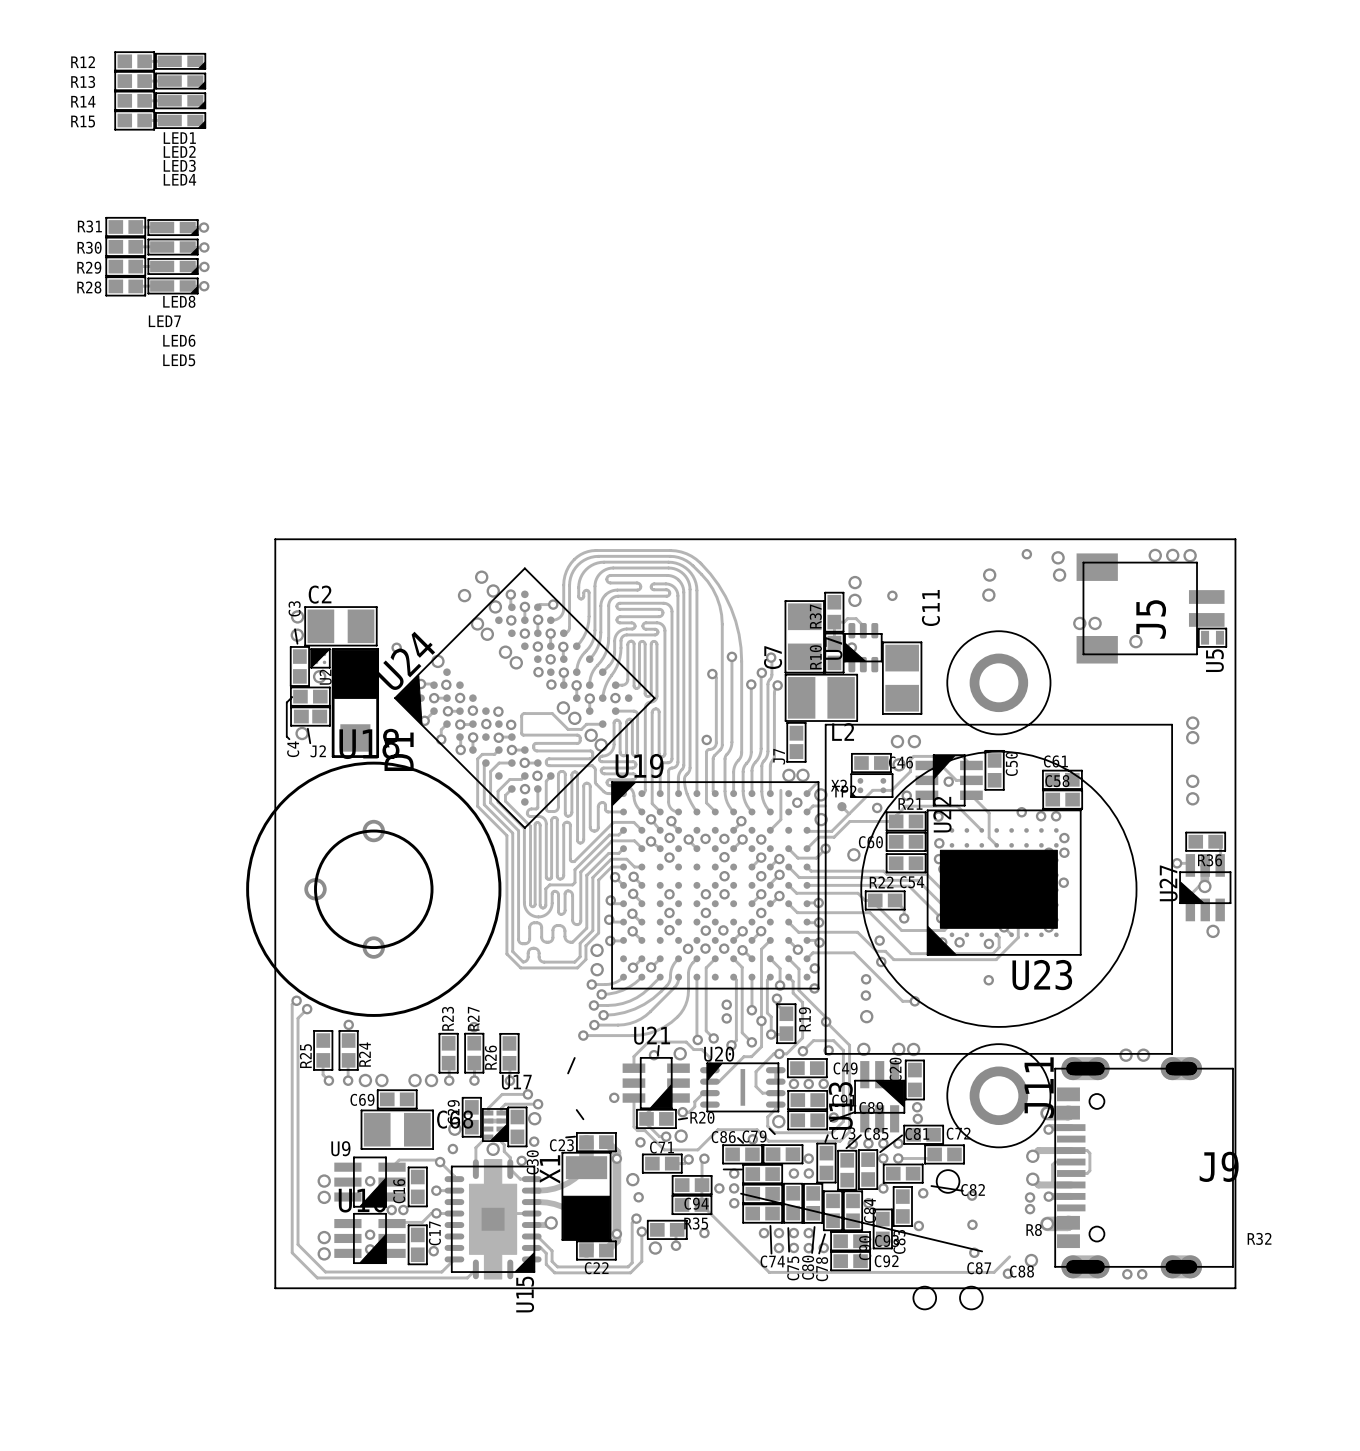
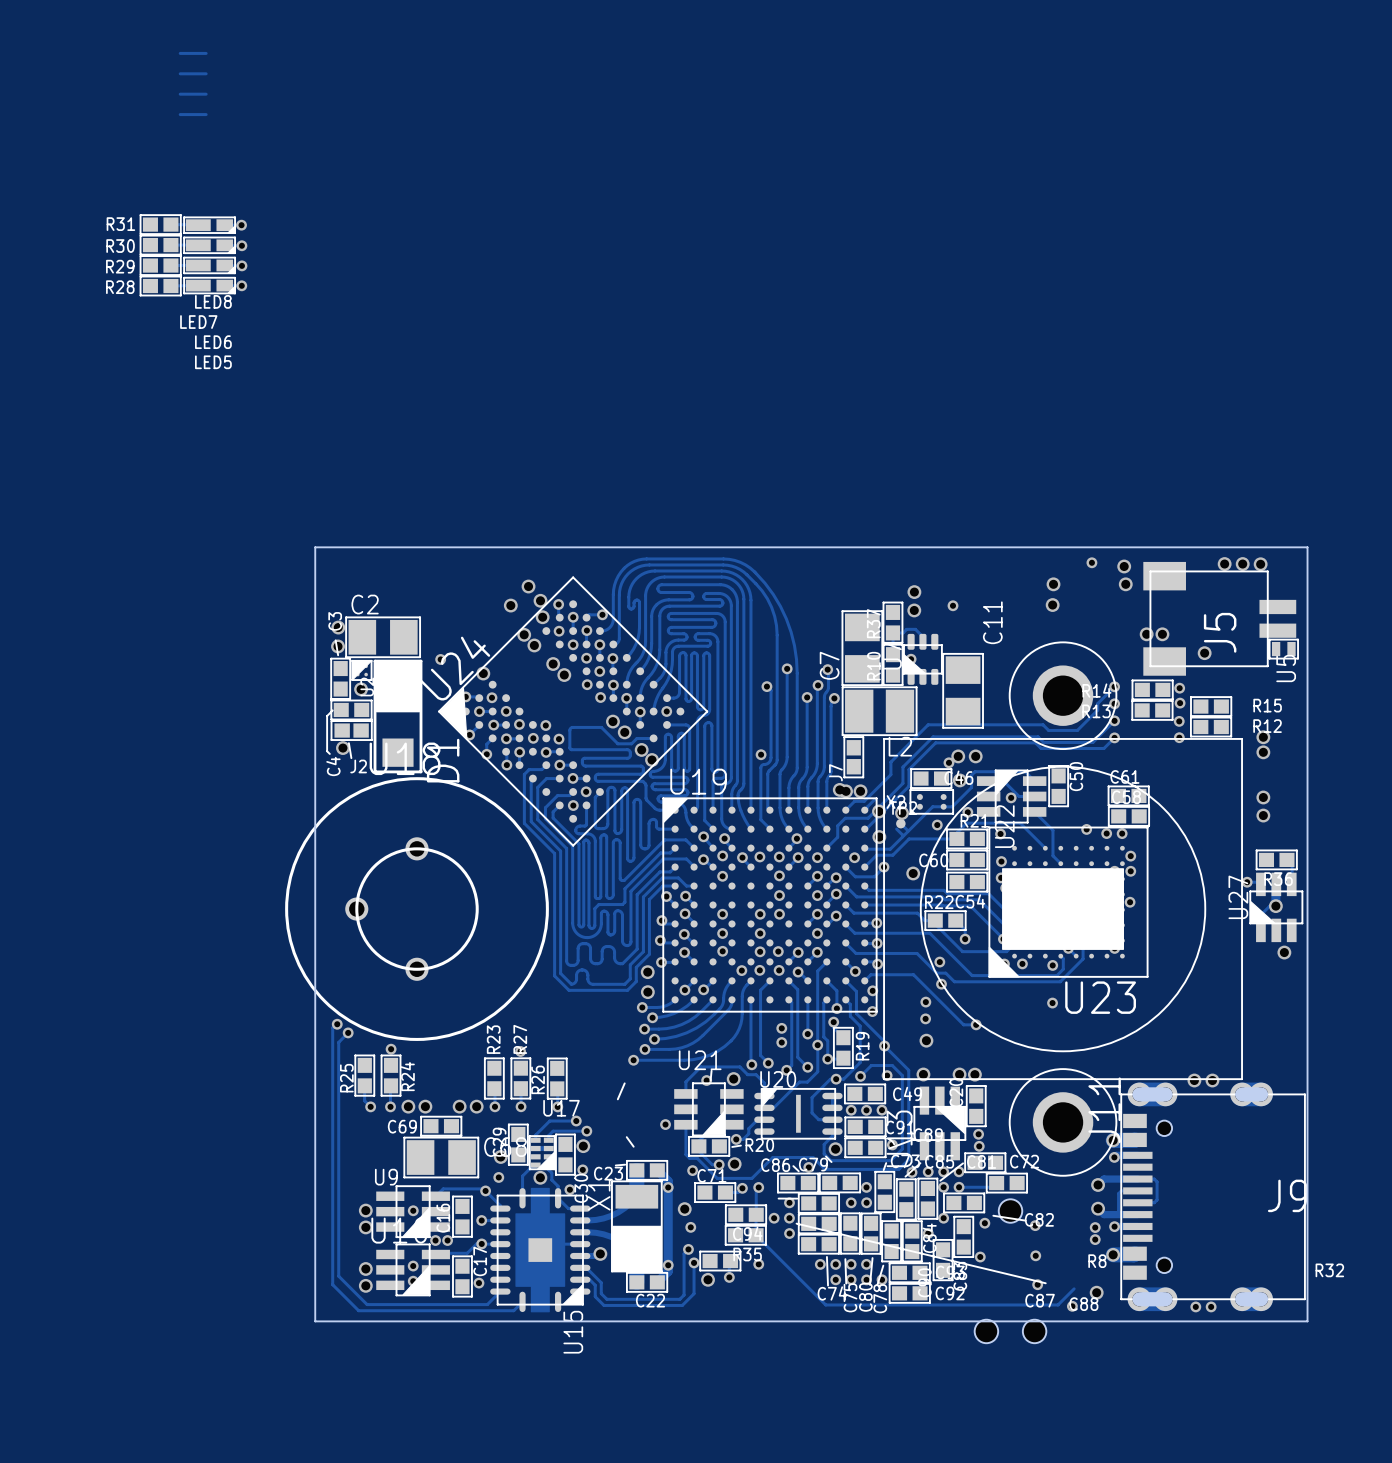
R12 position: (134, 61) -> (1211, 727)
LED1: (180, 61) -> none
R12 name position: R12 (83, 62) -> R12 (1267, 726)
R13 position: (134, 81) -> (1152, 710)
LED2: (180, 81) -> none
R14 position: (134, 100) -> (1152, 689)
LED3: (180, 100) -> none
R15 position: (134, 120) -> (1211, 706)
LED4: (180, 120) -> none
R15 name position: R15 (83, 121) -> R15 (1267, 705)
track: none -> (1114, 686) (1097, 703) (1097, 710) (1077, 730) (1048, 730) (1043, 724) (928, 724) (890, 762) (890, 774) (864, 801) (854, 801) (845, 810)
via: none -> (1114, 686)
via: none -> (1179, 688)
via: none -> (1114, 703)
via: none -> (1180, 703)
via: none -> (1114, 720)
via: none -> (1179, 721)
via: none -> (1114, 737)
via: none -> (1179, 737)
via: none -> (948, 762)
via: none -> (839, 789)
track: (780, 790) (780, 808) -> (1114, 720) (1092, 742) (1043, 742) (1038, 736) (933, 736) (902, 767) (902, 783) (868, 818) (845, 818) (837, 825)
via: none -> (901, 813)
via position: (797, 802) -> (854, 857)
track: (825, 805) (813, 805) (807, 811) -> (1114, 737) (1103, 748) (1041, 748) (1035, 742) (935, 742) (908, 769) (908, 786) (864, 829)
track: none -> (896, 829) (902, 836)

